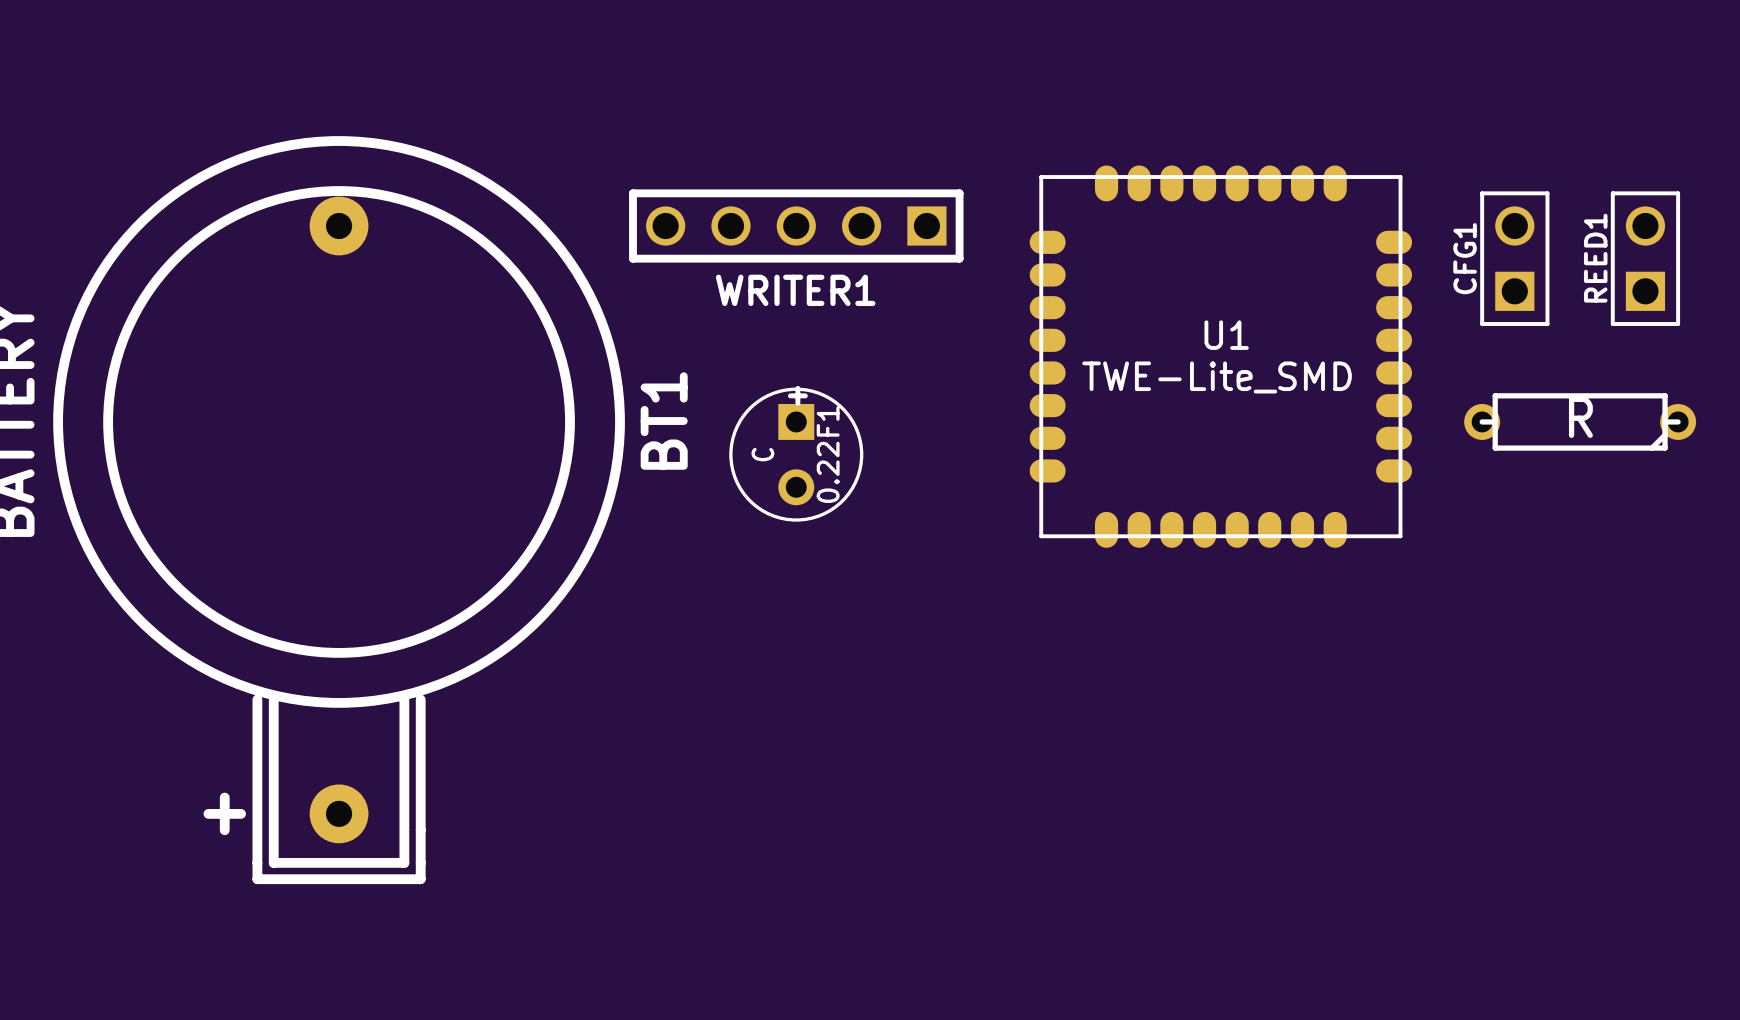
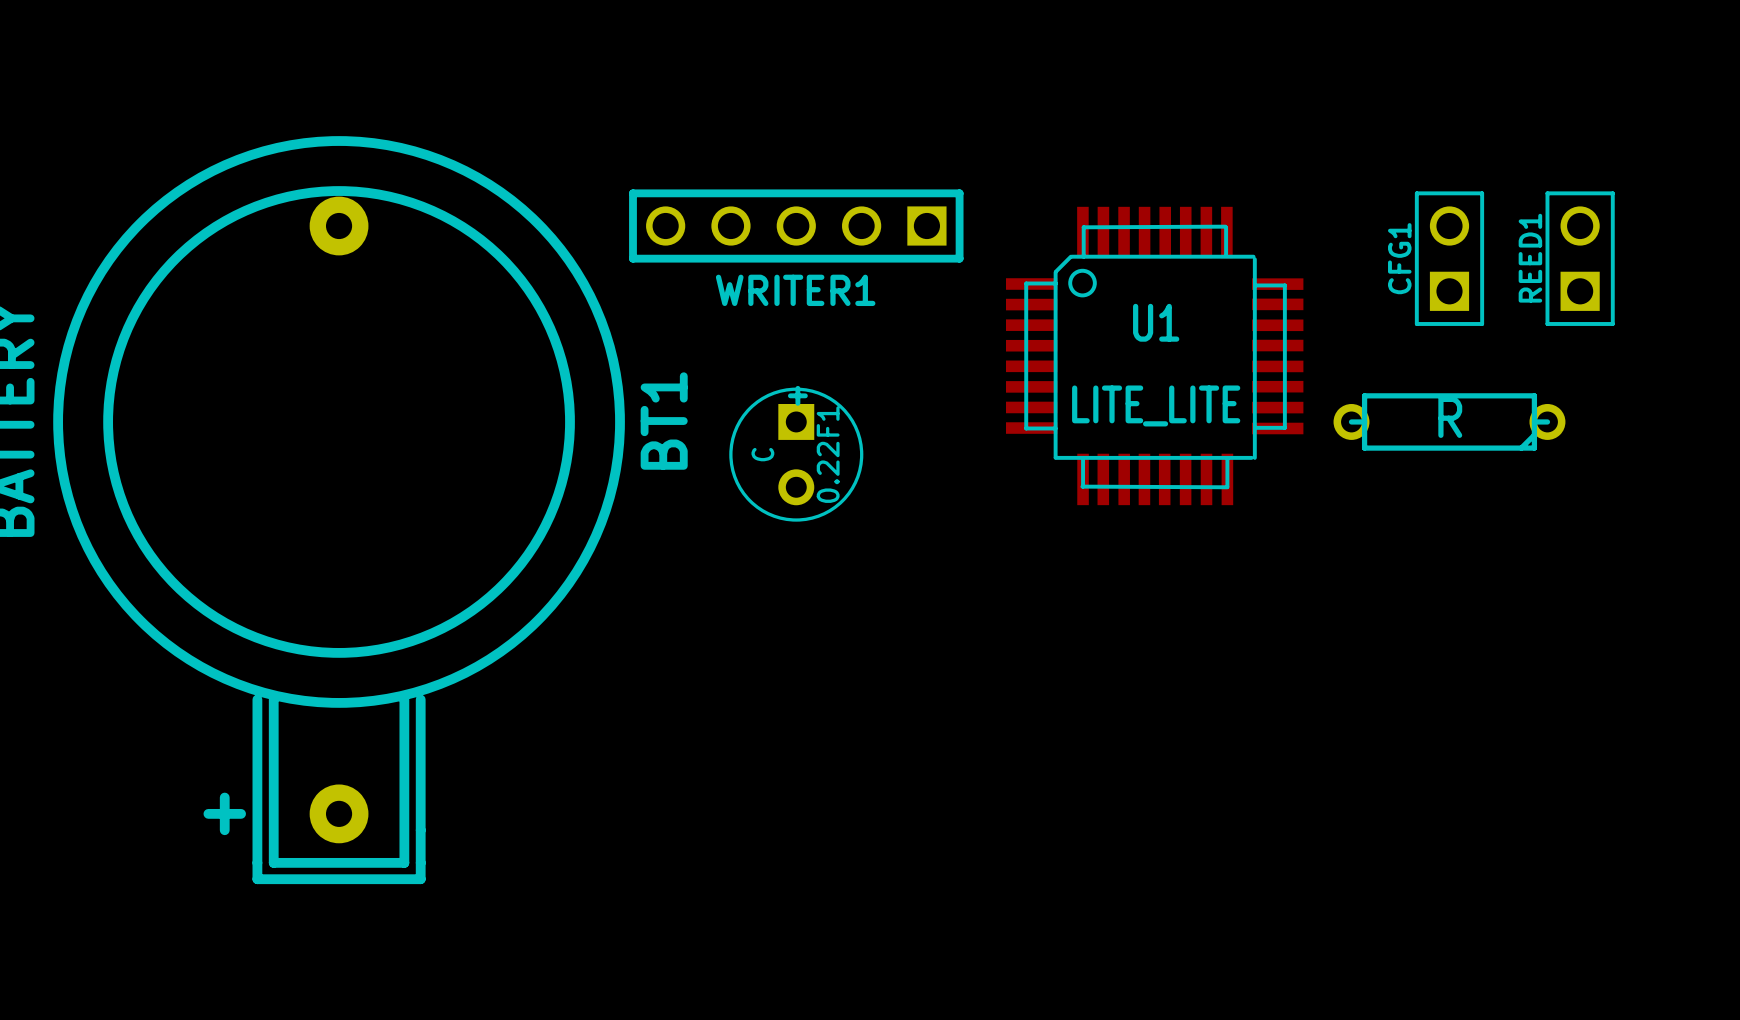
U1 footprint: [1029, 165, 1413, 548] -> [1006, 206, 1304, 506]
CFG1 position: (1514, 258) -> (1449, 258)
REED1 position: (1645, 258) -> (1580, 258)
U1 value: TWE-Lite_SMD (1217, 377) -> LITE_LITE (1156, 405)
part position: (1580, 421) -> (1449, 421)

